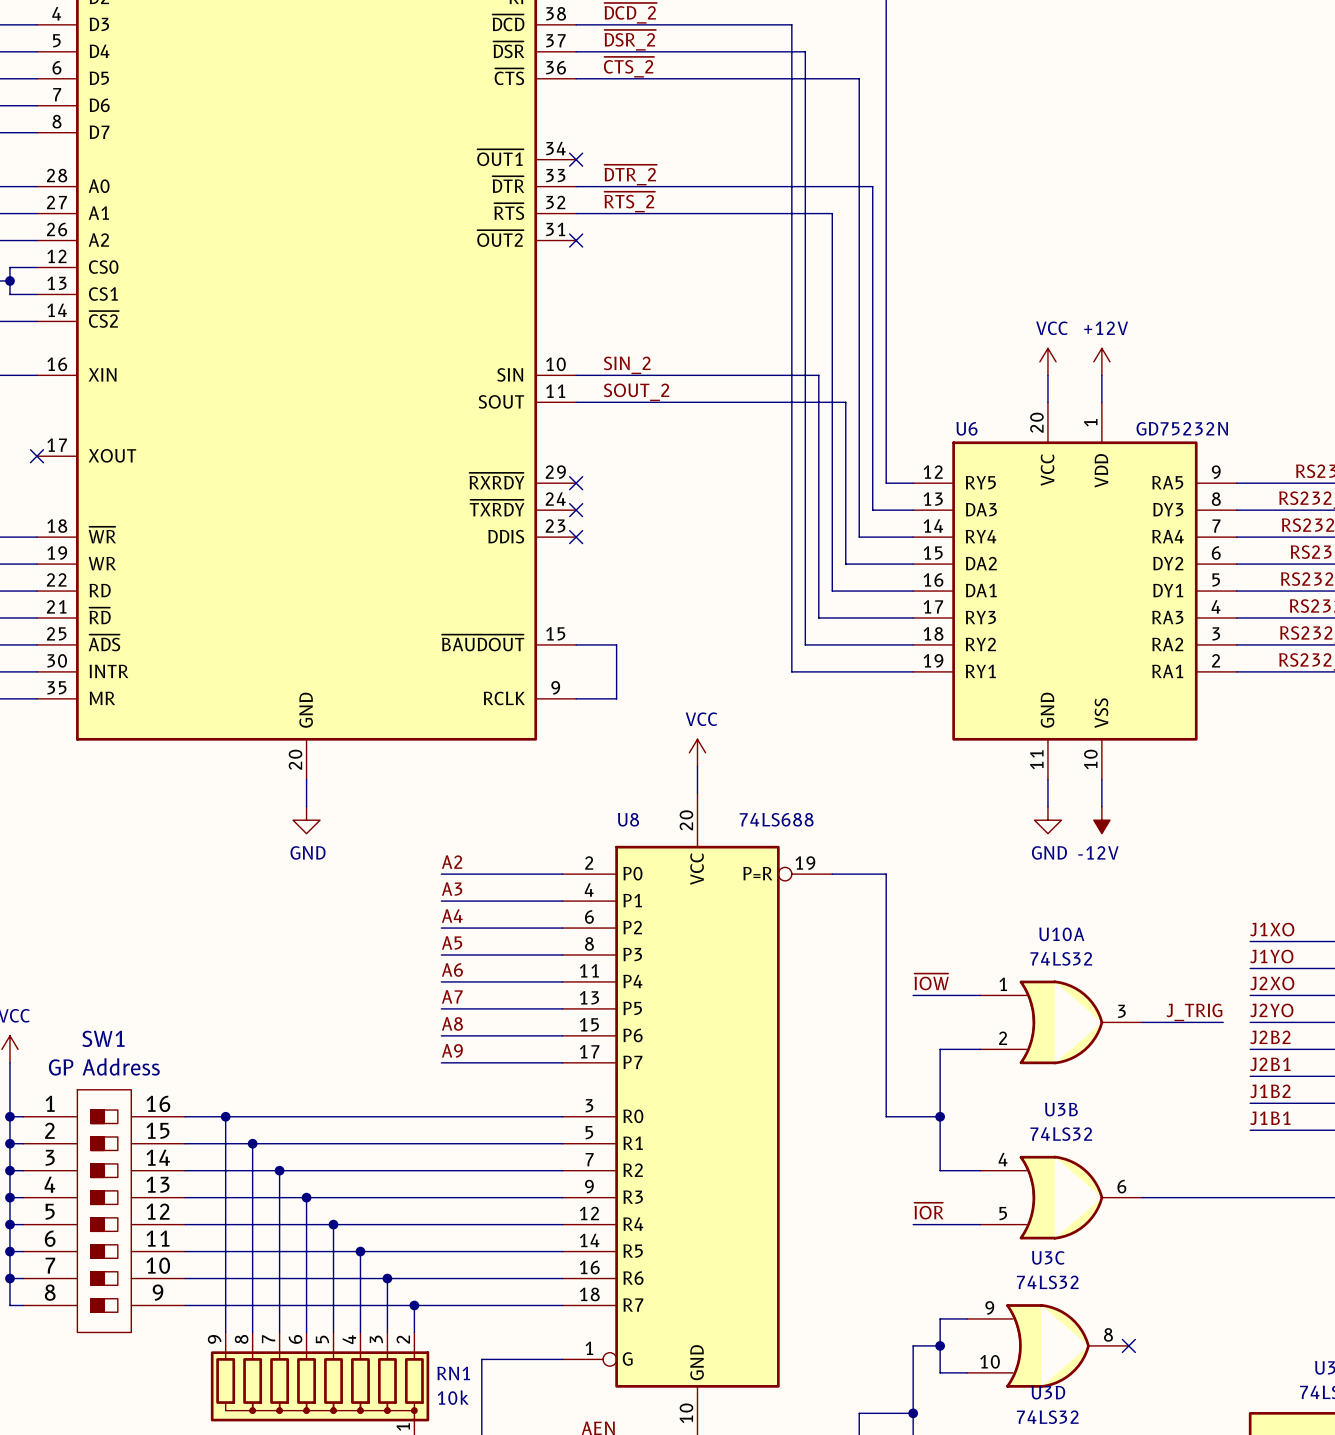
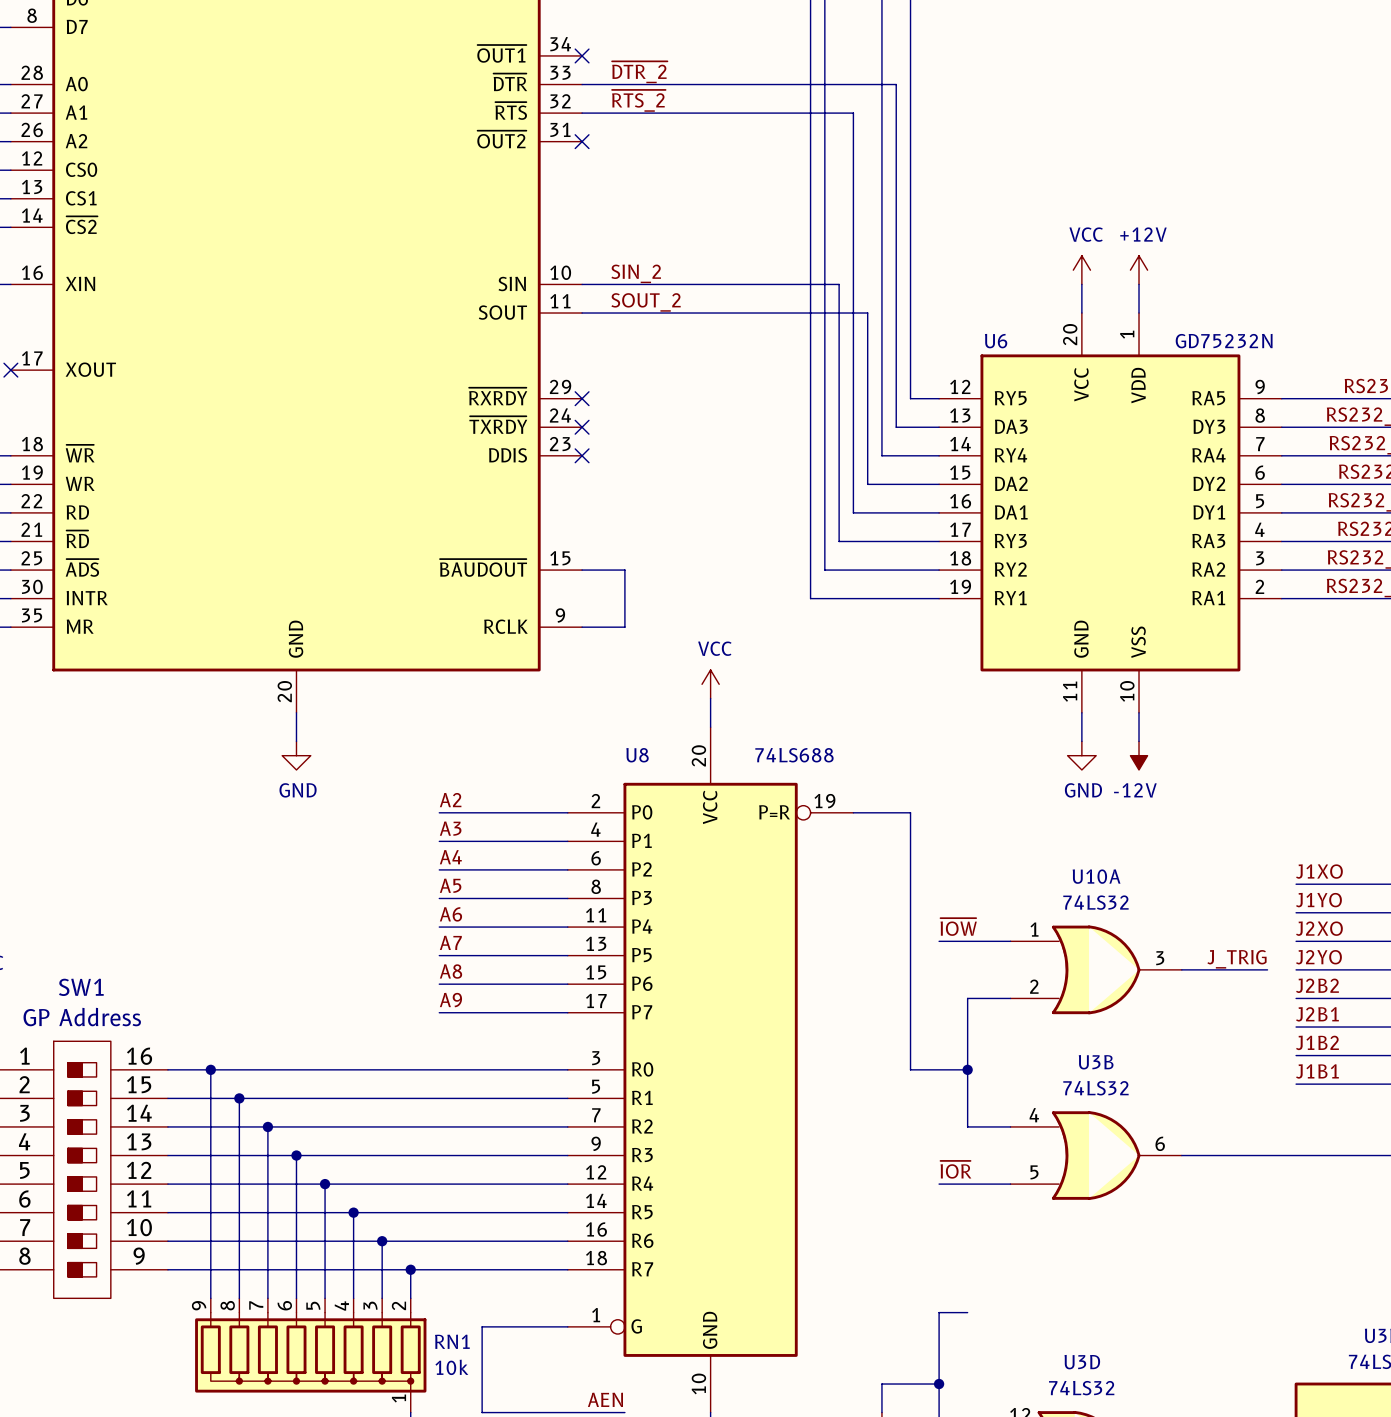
wire: (967, 1318) (940, 1318) (940, 1372) (967, 1372) -> none
junction: (940, 1345) -> none
U3C: 74LS32 (1047, 1345) -> none
no-connect mark: (1128, 1345) -> none

